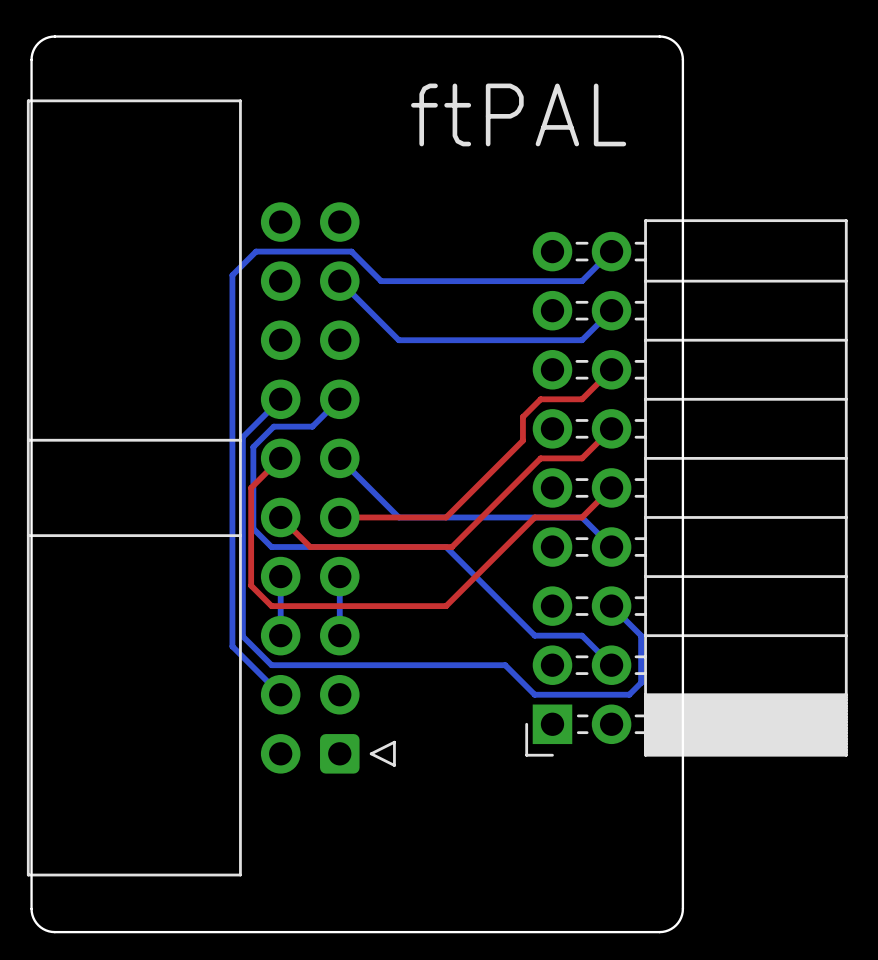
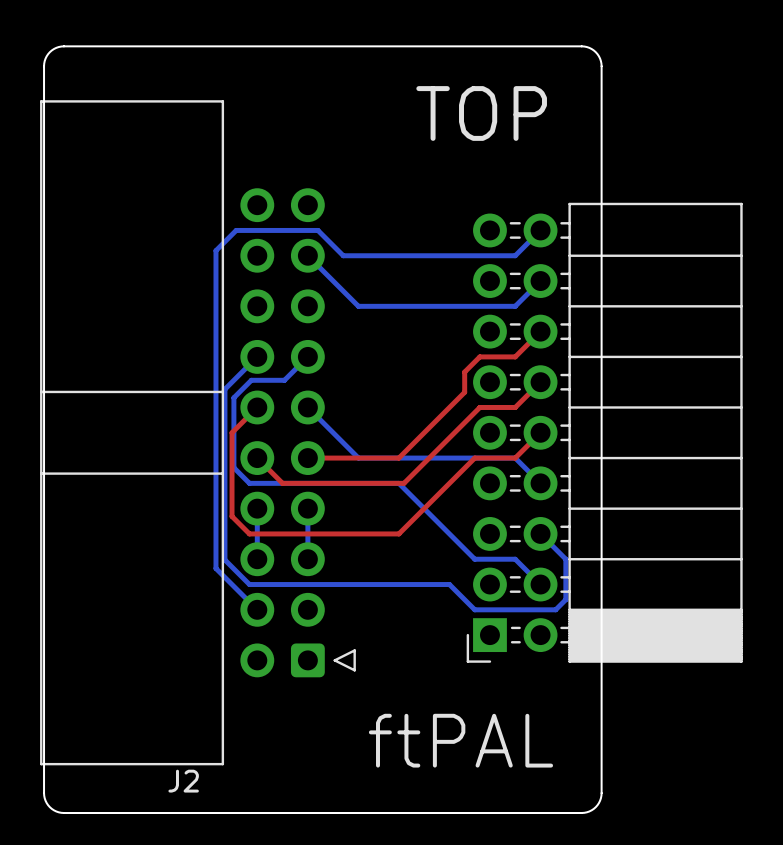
text: ftPAL (518, 114) -> none
text: none -> TOP (481, 113)
text: none -> ftPAL (460, 740)
J2 name: none -> J2 (183, 781)

